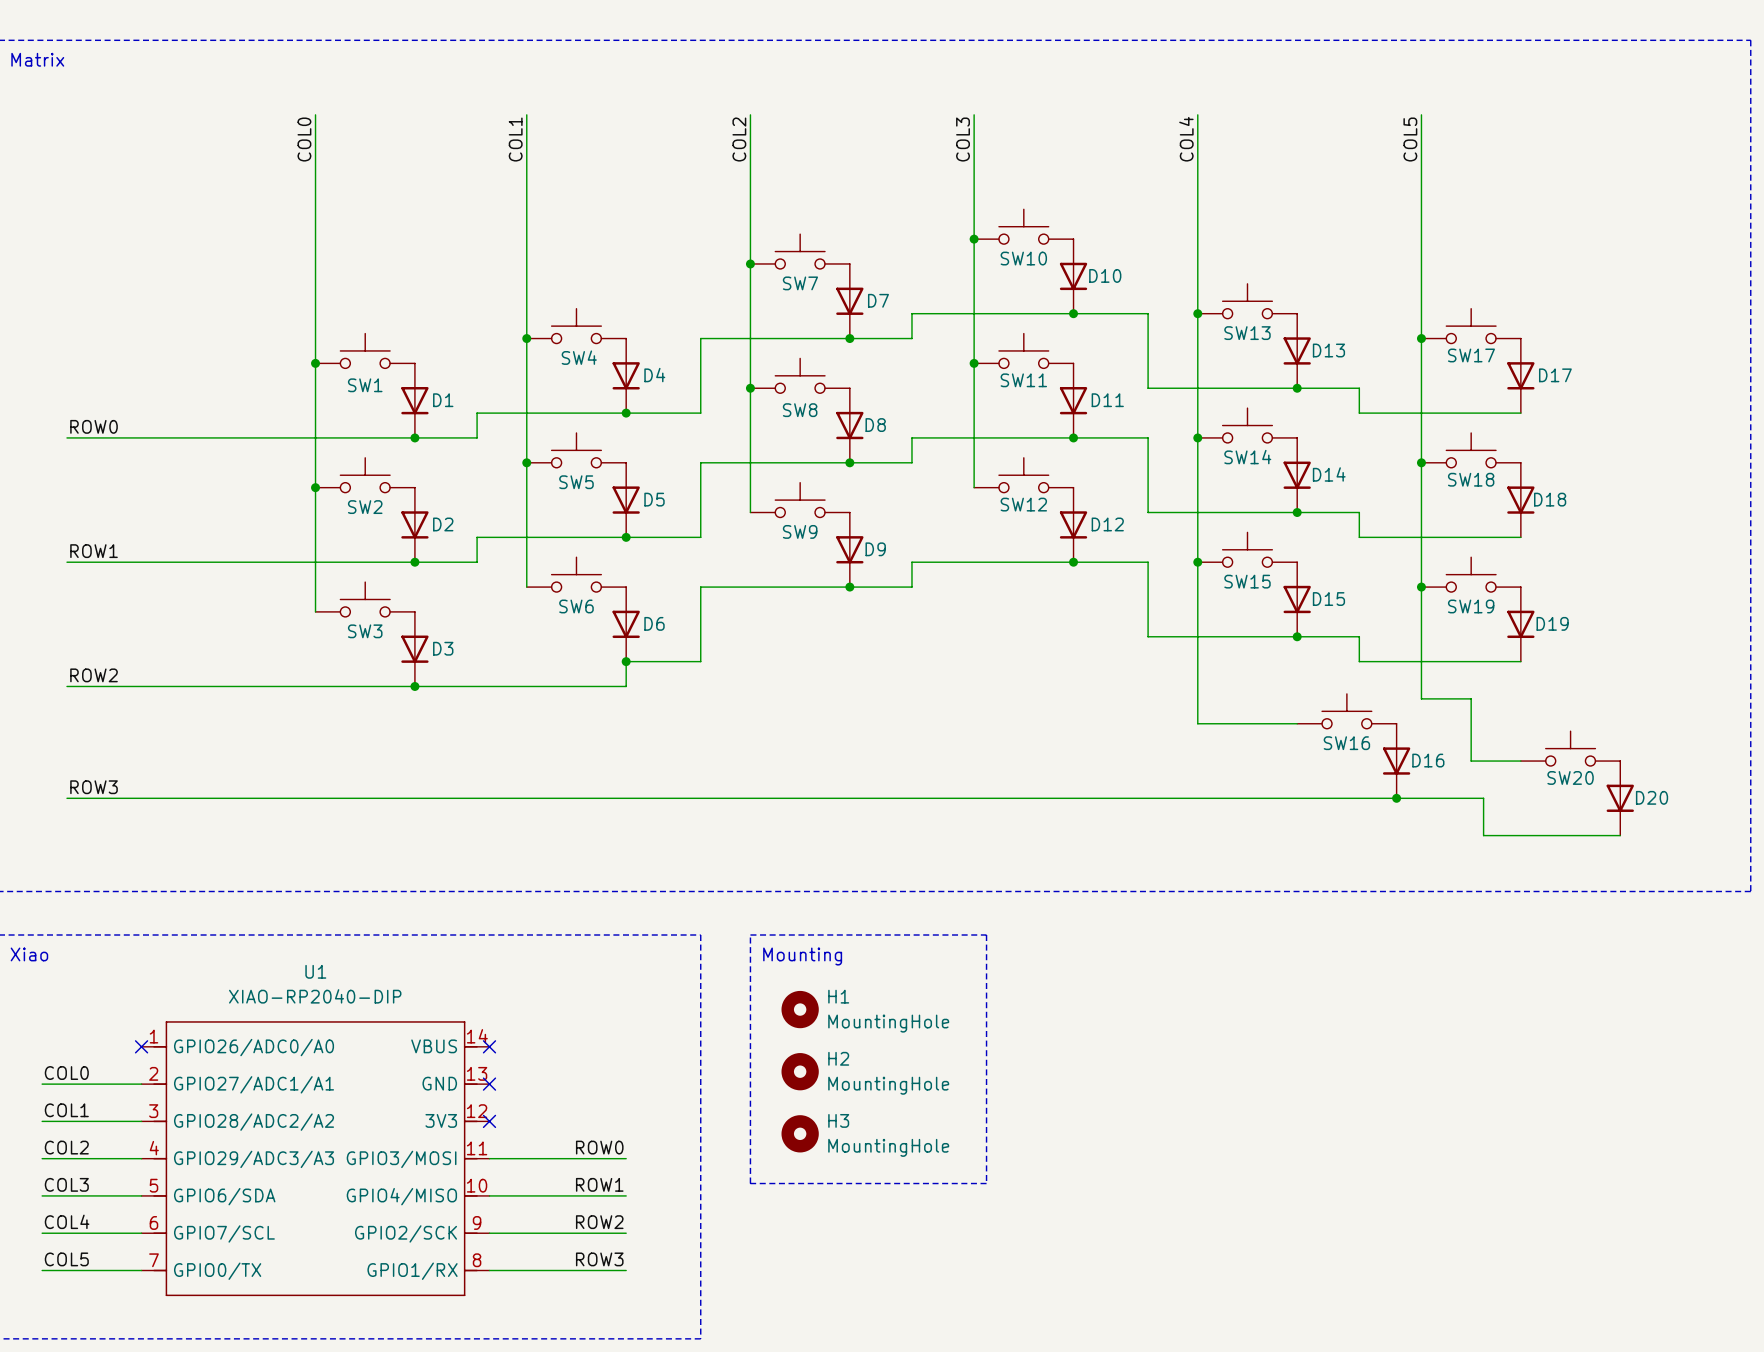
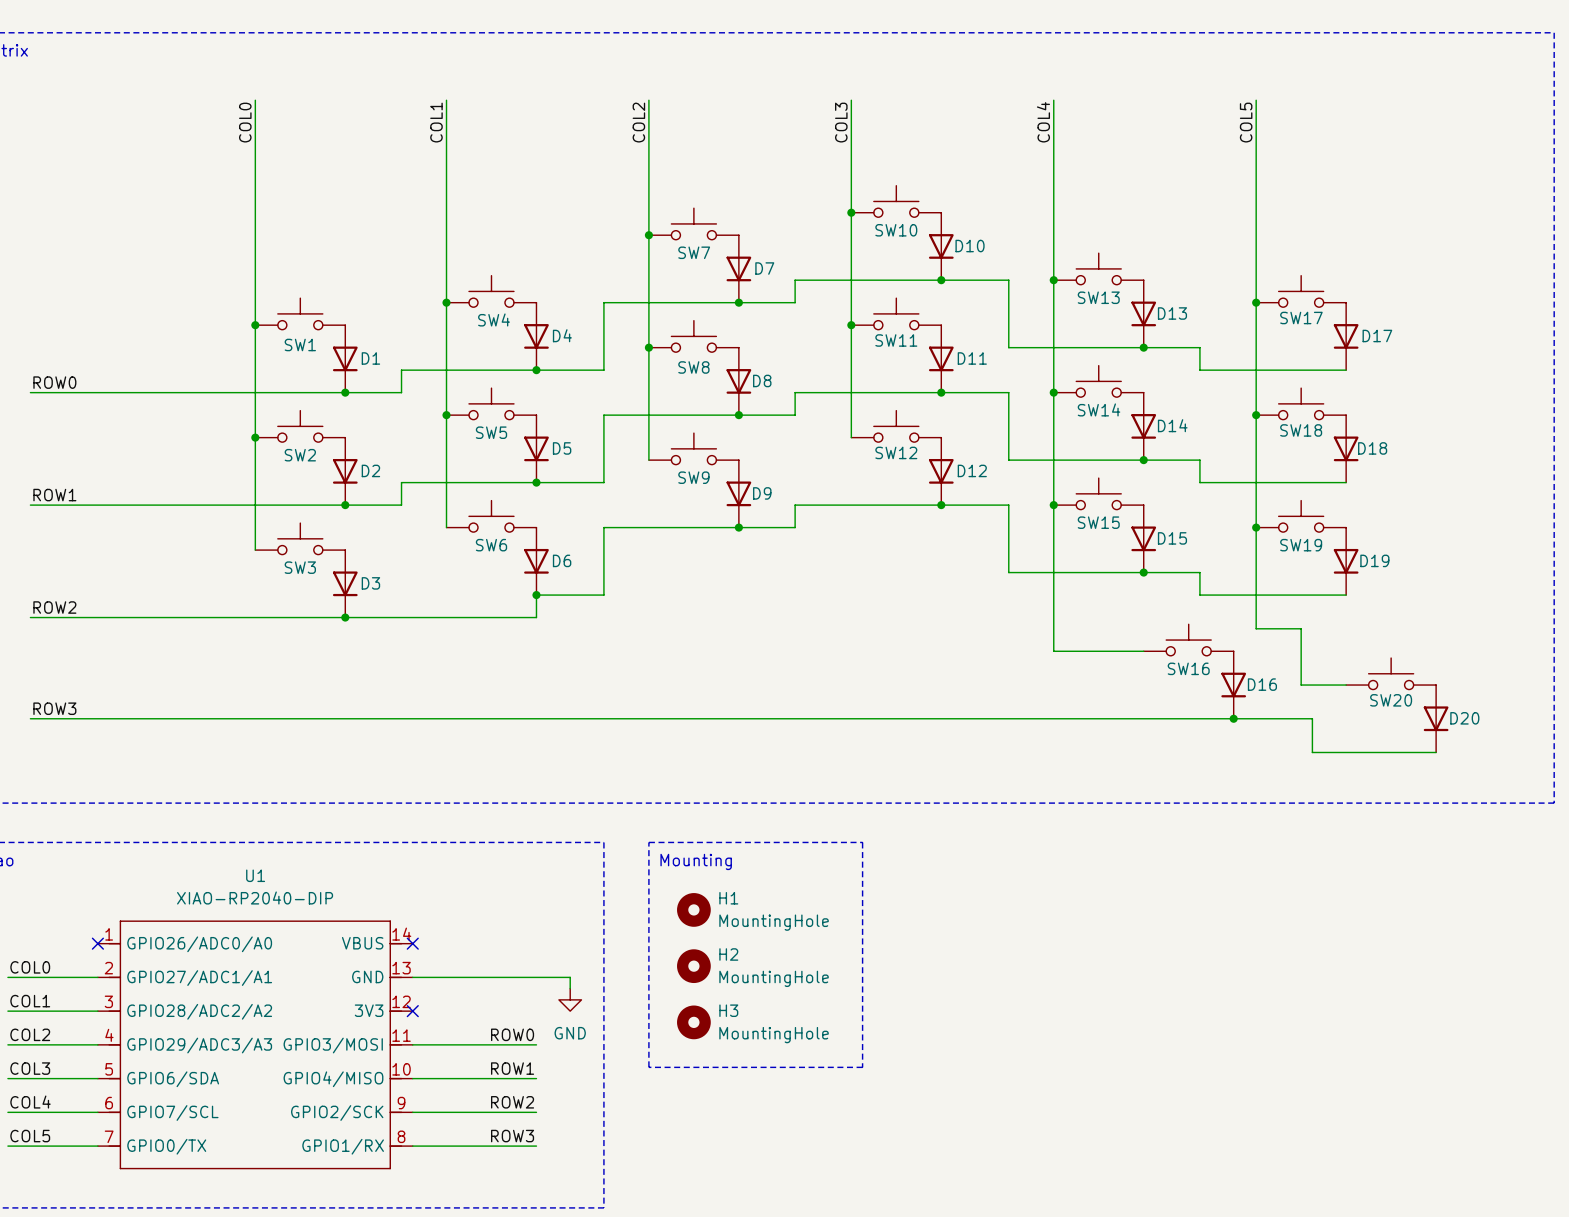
wire: none -> (412, 977) (570, 977) (570, 988)
no-connect mark: (489, 1084) -> none
power symbol: none -> GND (570, 999)

